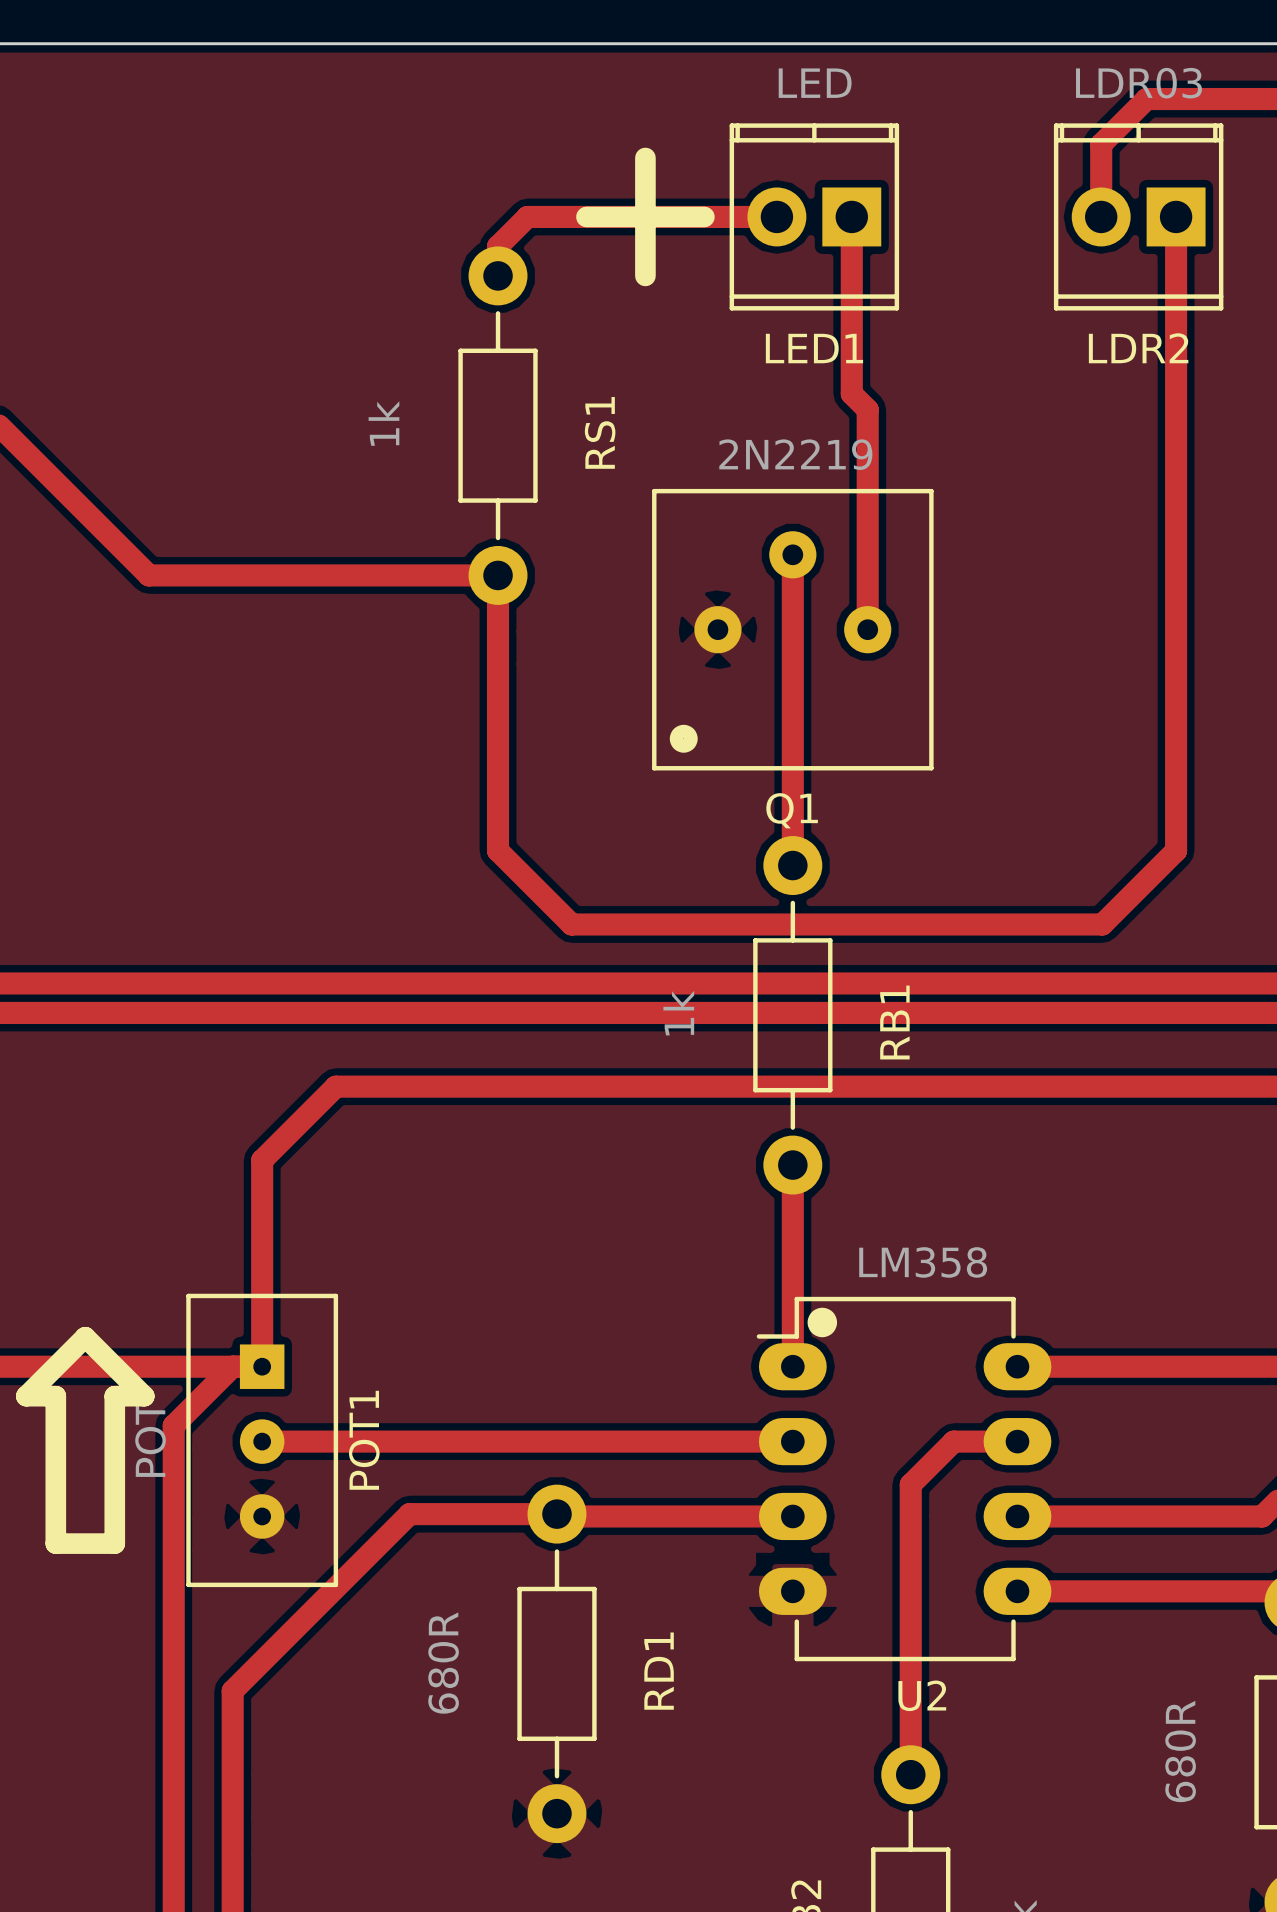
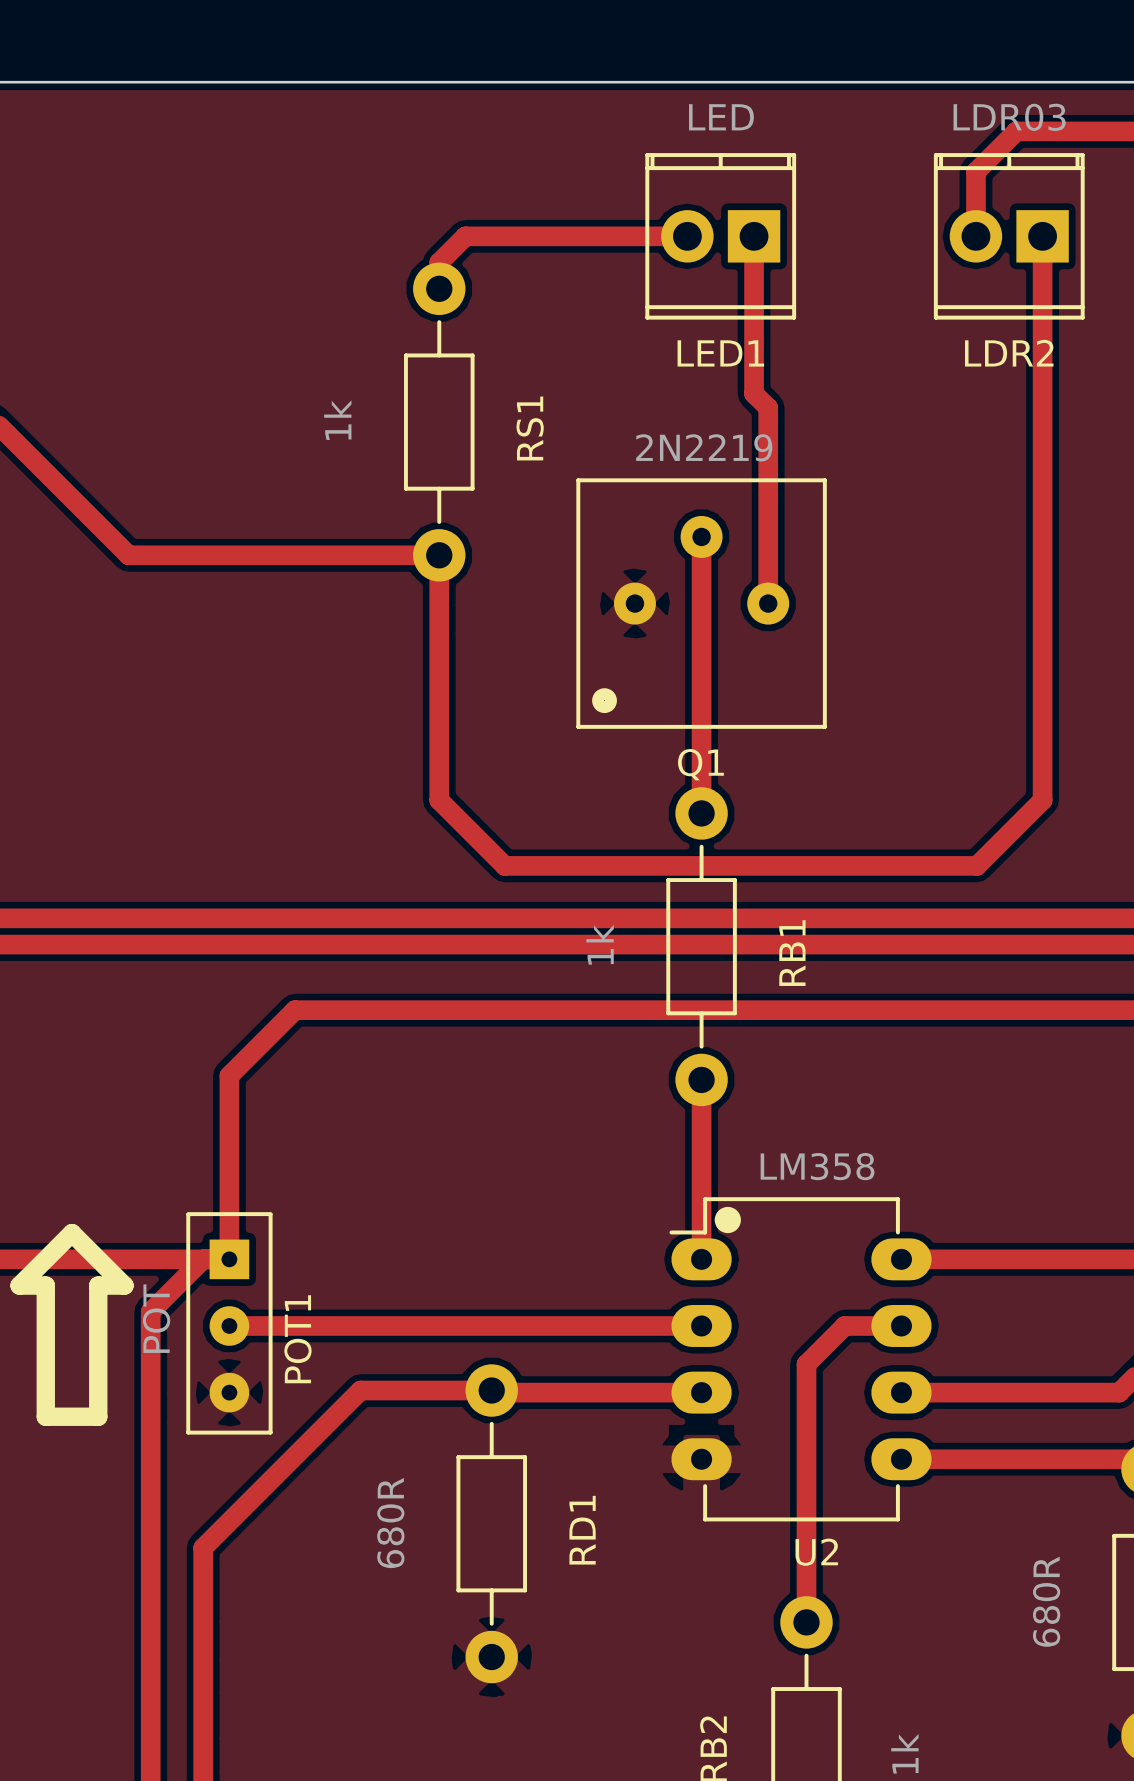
line: (645, 157) (645, 275) -> none
line: (586, 216) (704, 216) -> none
POT1 footprint: [186, 1293, 339, 1588] -> [186, 1212, 273, 1435]

